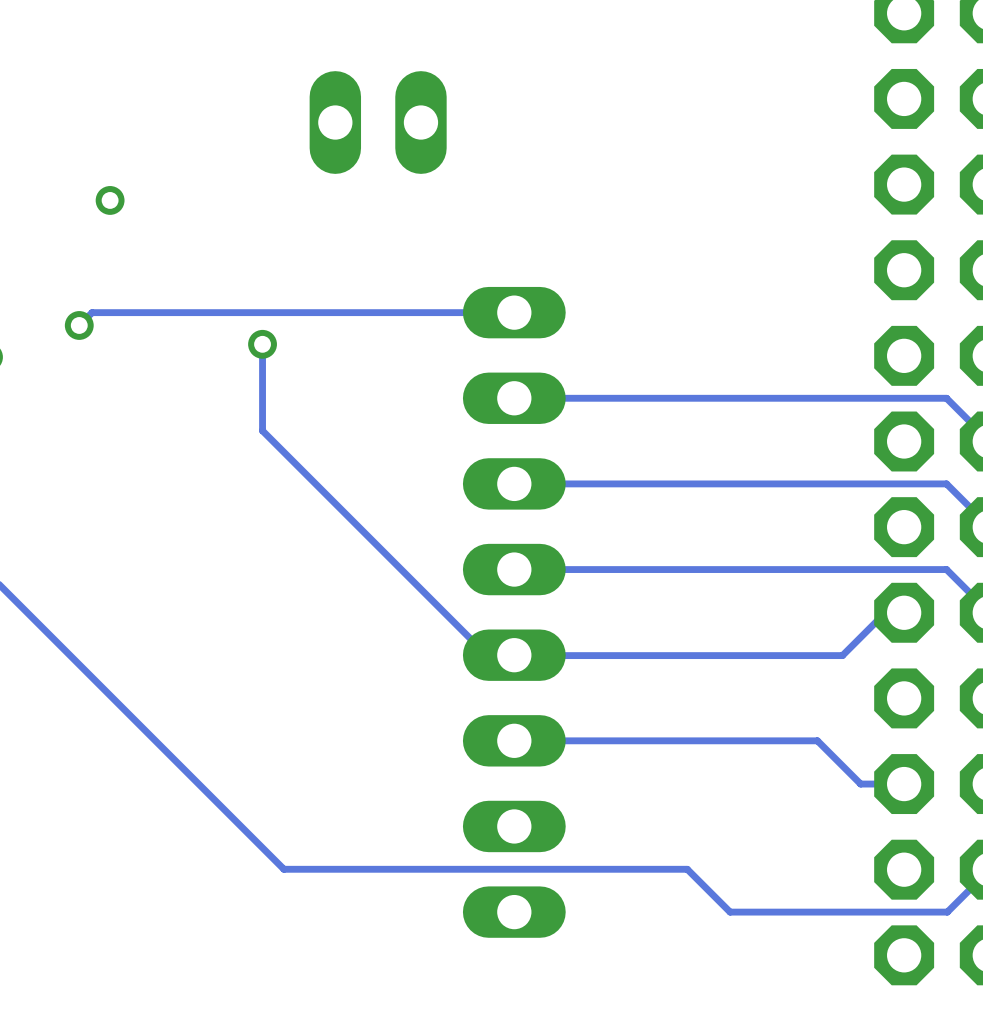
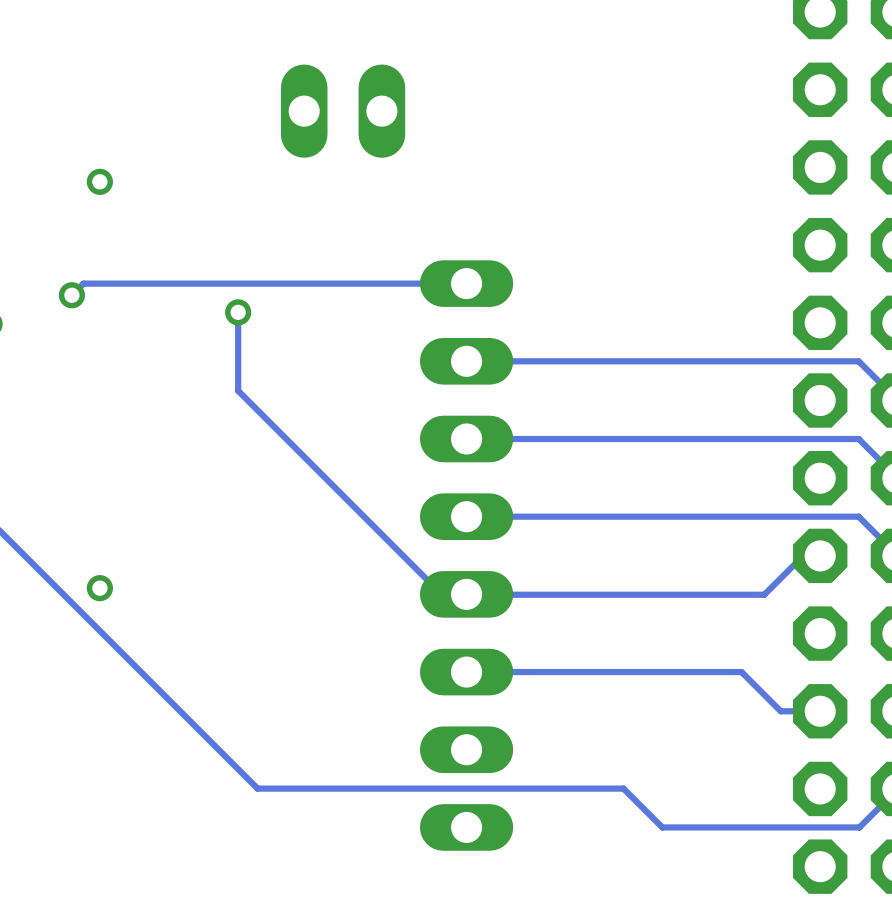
via: none -> (99, 588)

